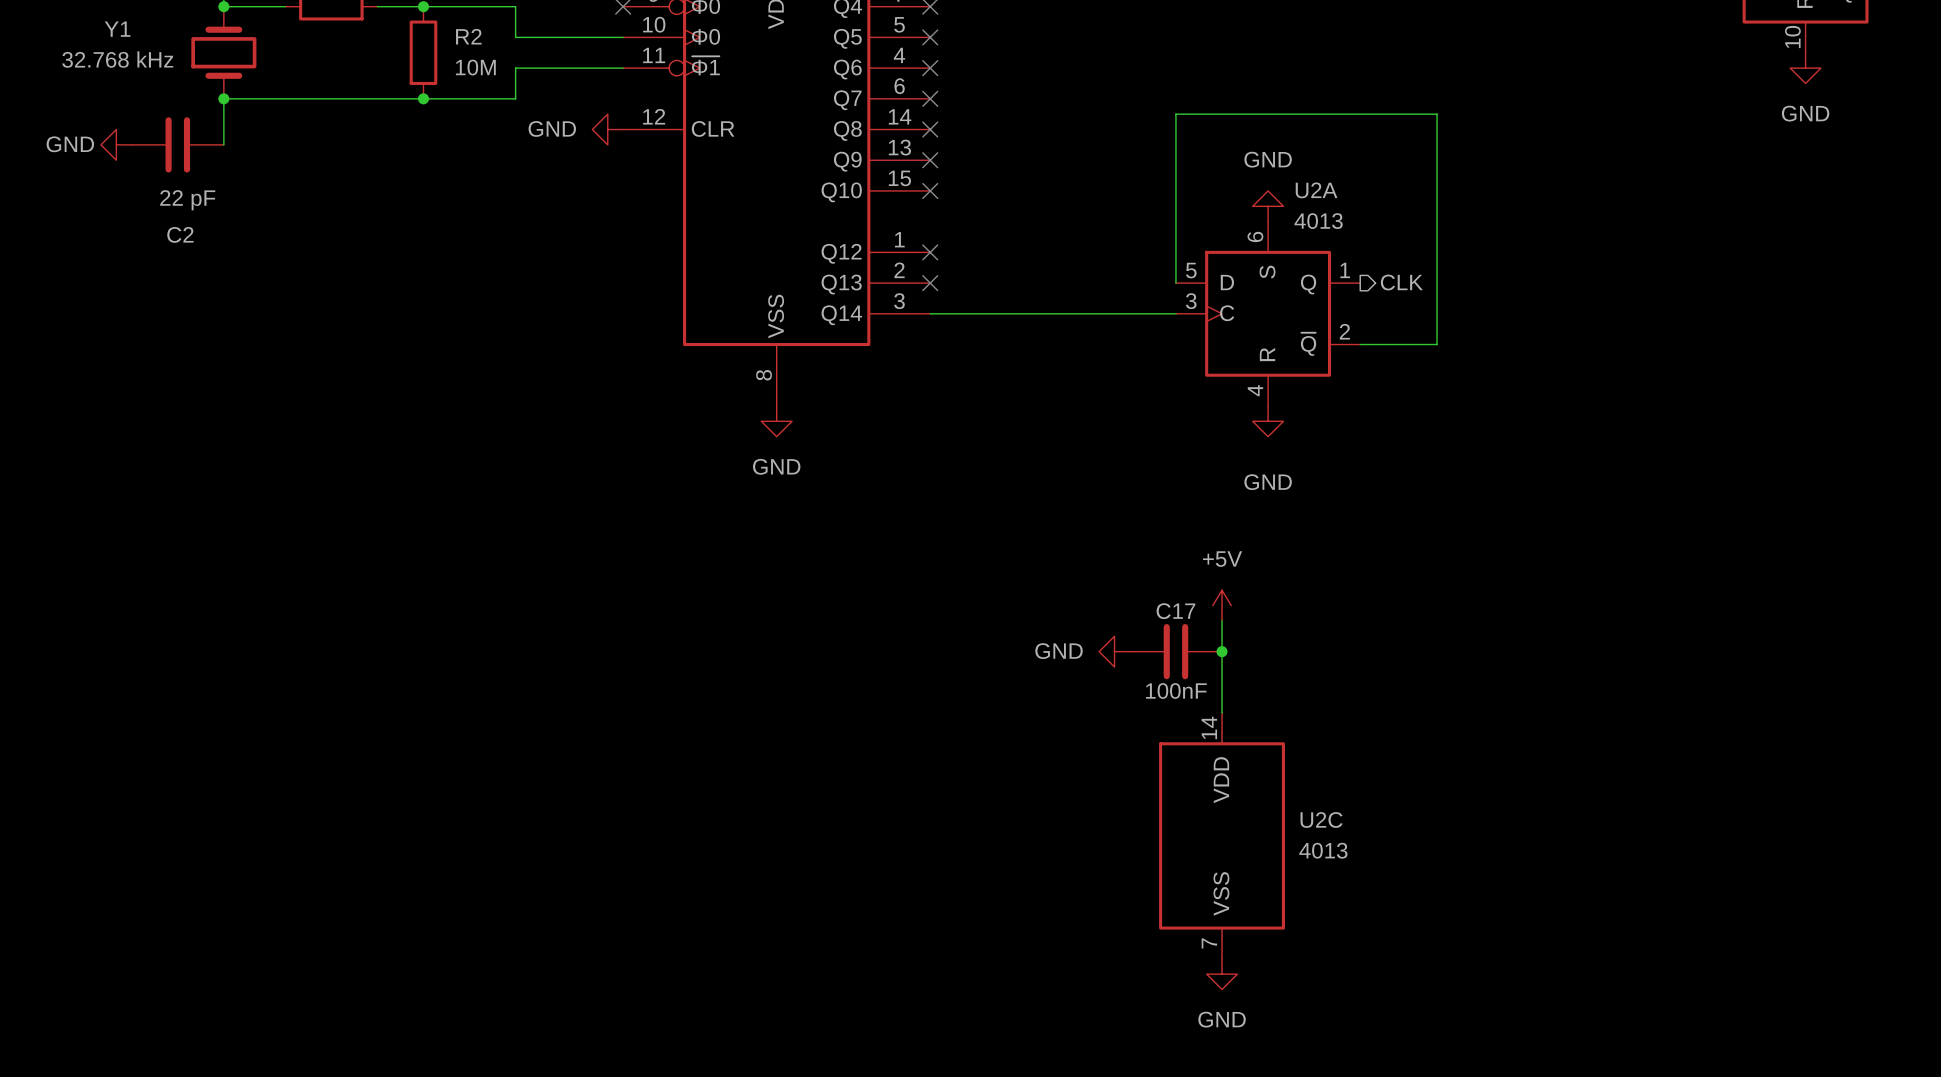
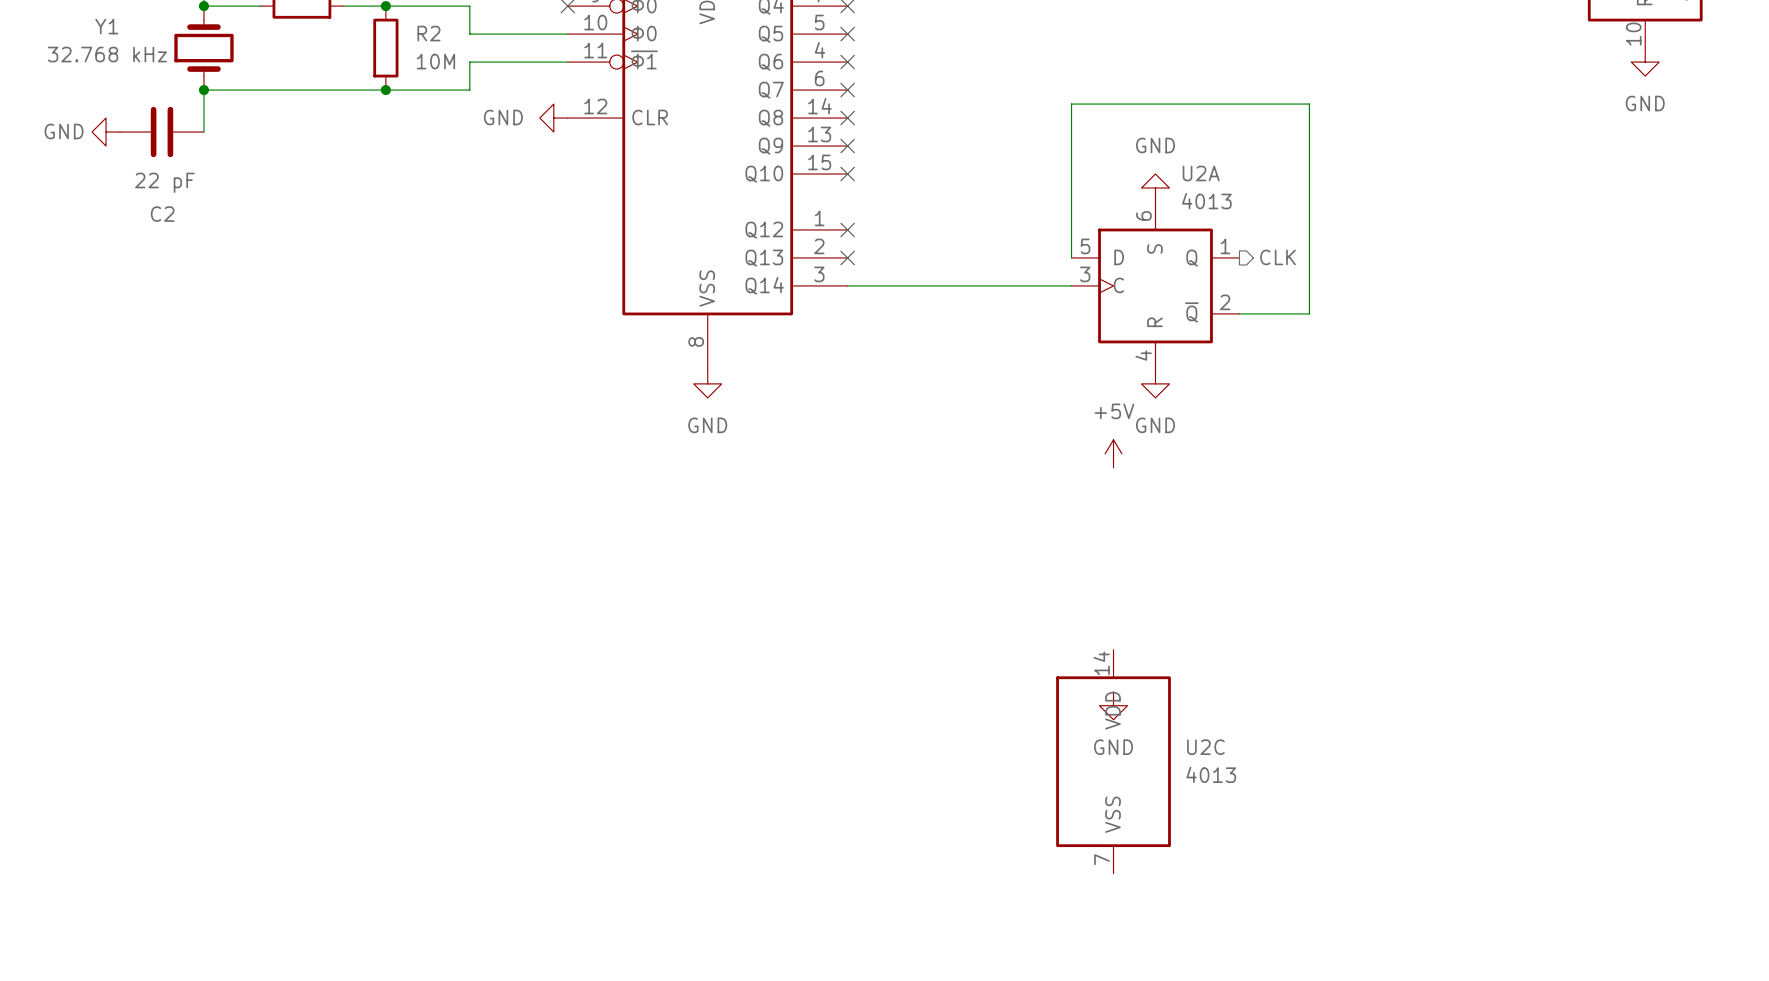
power symbol text position: GND (1268, 482) -> GND (1155, 425)
power symbol position: +5V (1222, 605) -> +5V (1113, 453)
wire: (1222, 620) (1222, 713) -> none
power symbol: GND (1114, 651) -> none
C17: 100nF (1175, 651) -> none
junction: (1222, 651) -> none
power symbol: none -> GND (1113, 705)
power symbol: GND (1222, 974) -> none

